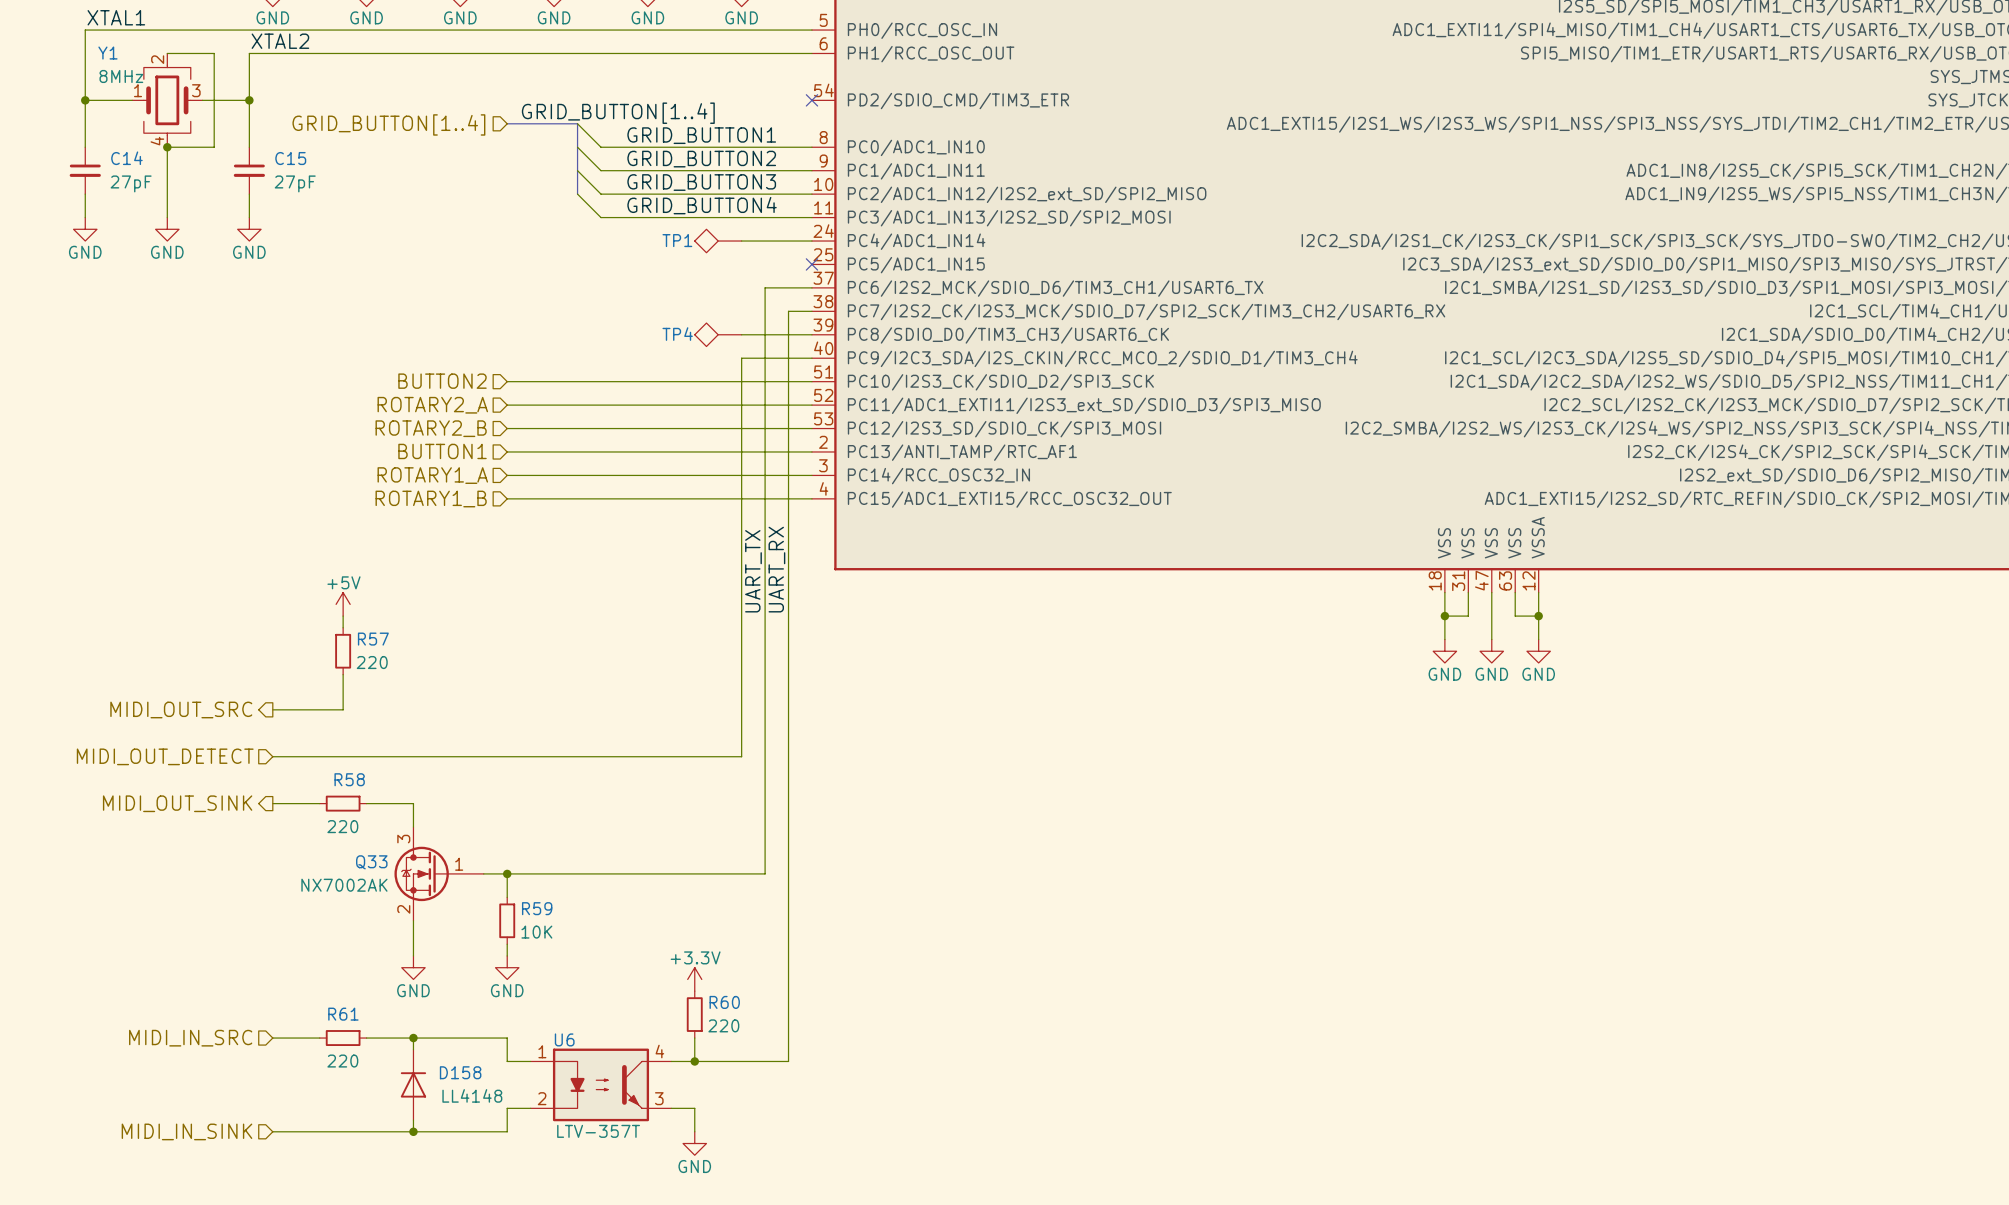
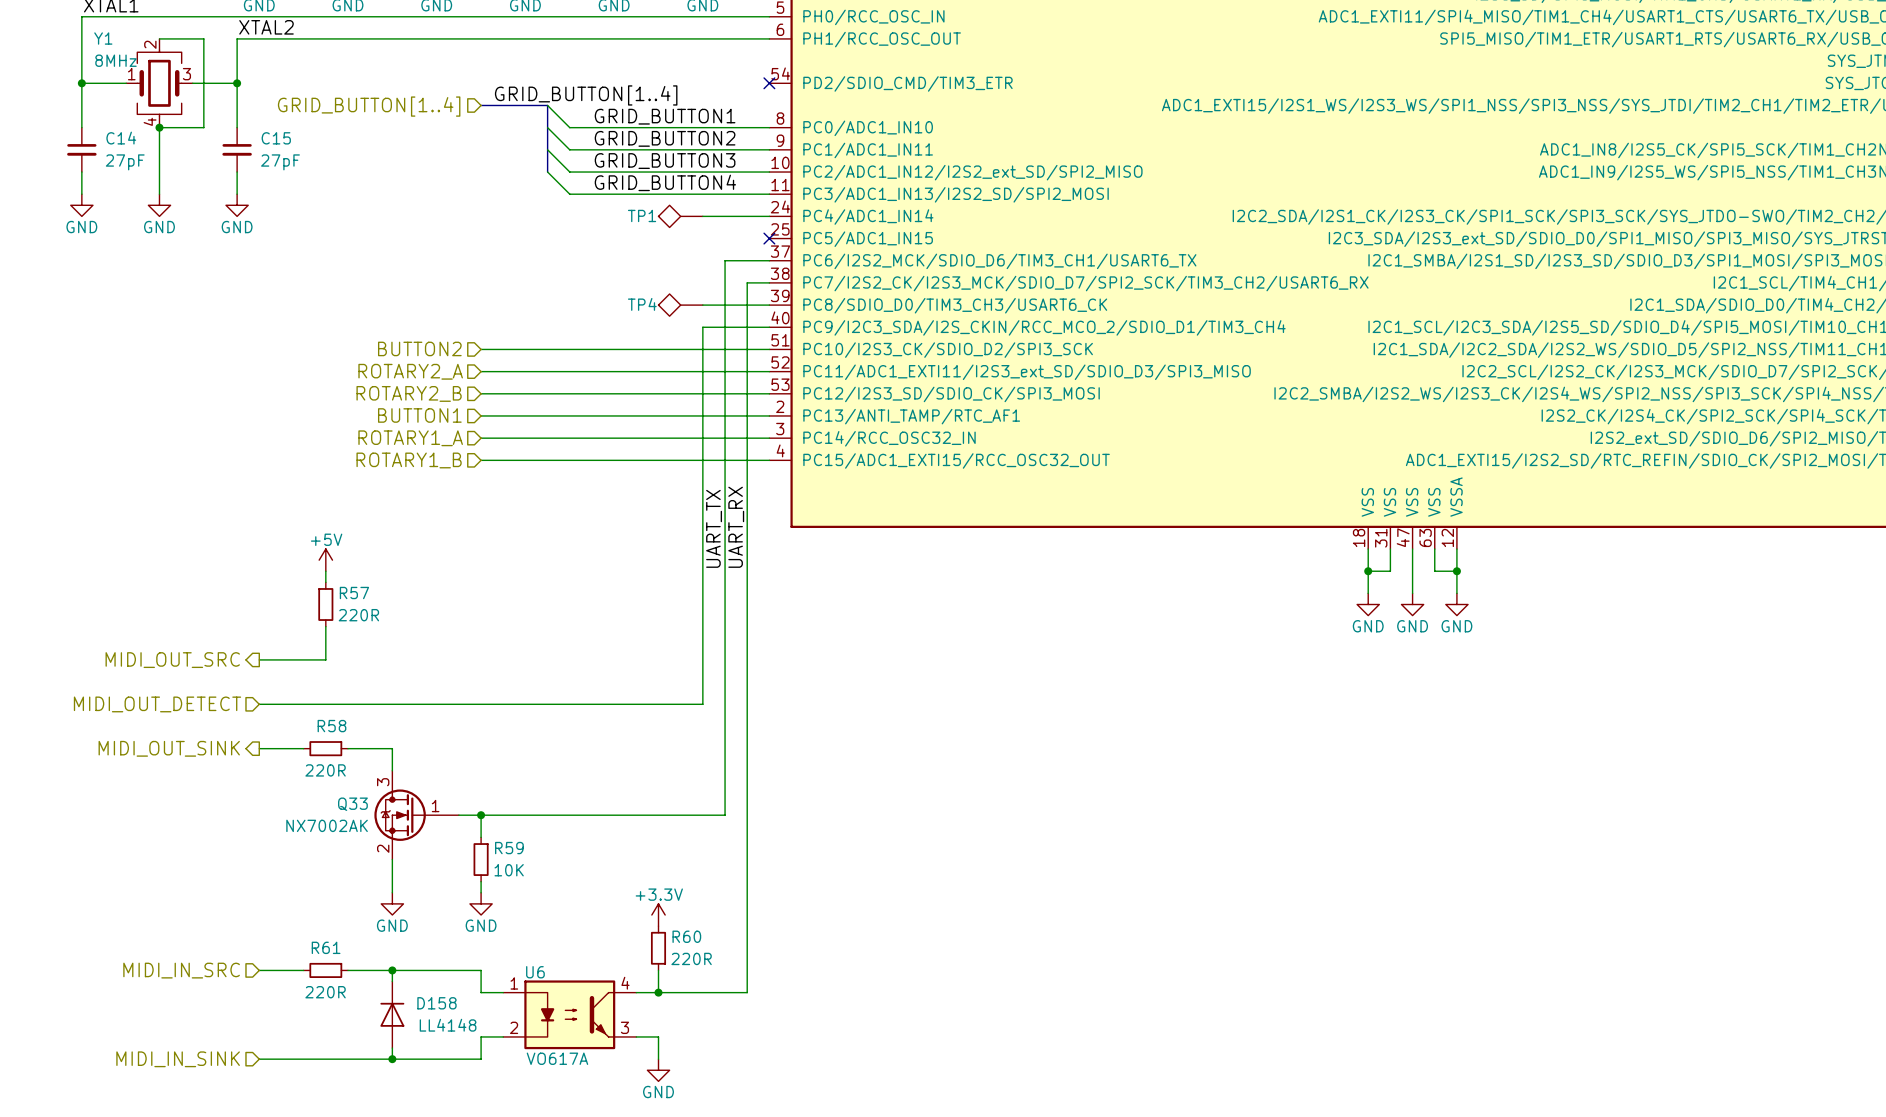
R57 value: 220 (372, 662) -> 220R (358, 615)
R58 value: 220 (342, 826) -> 220R (325, 770)
R60 value: 220 (723, 1025) -> 220R (691, 958)
R61 value: 220 (342, 1061) -> 220R (325, 992)
U6 value: LTV-357T (598, 1131) -> VO617A (557, 1058)

